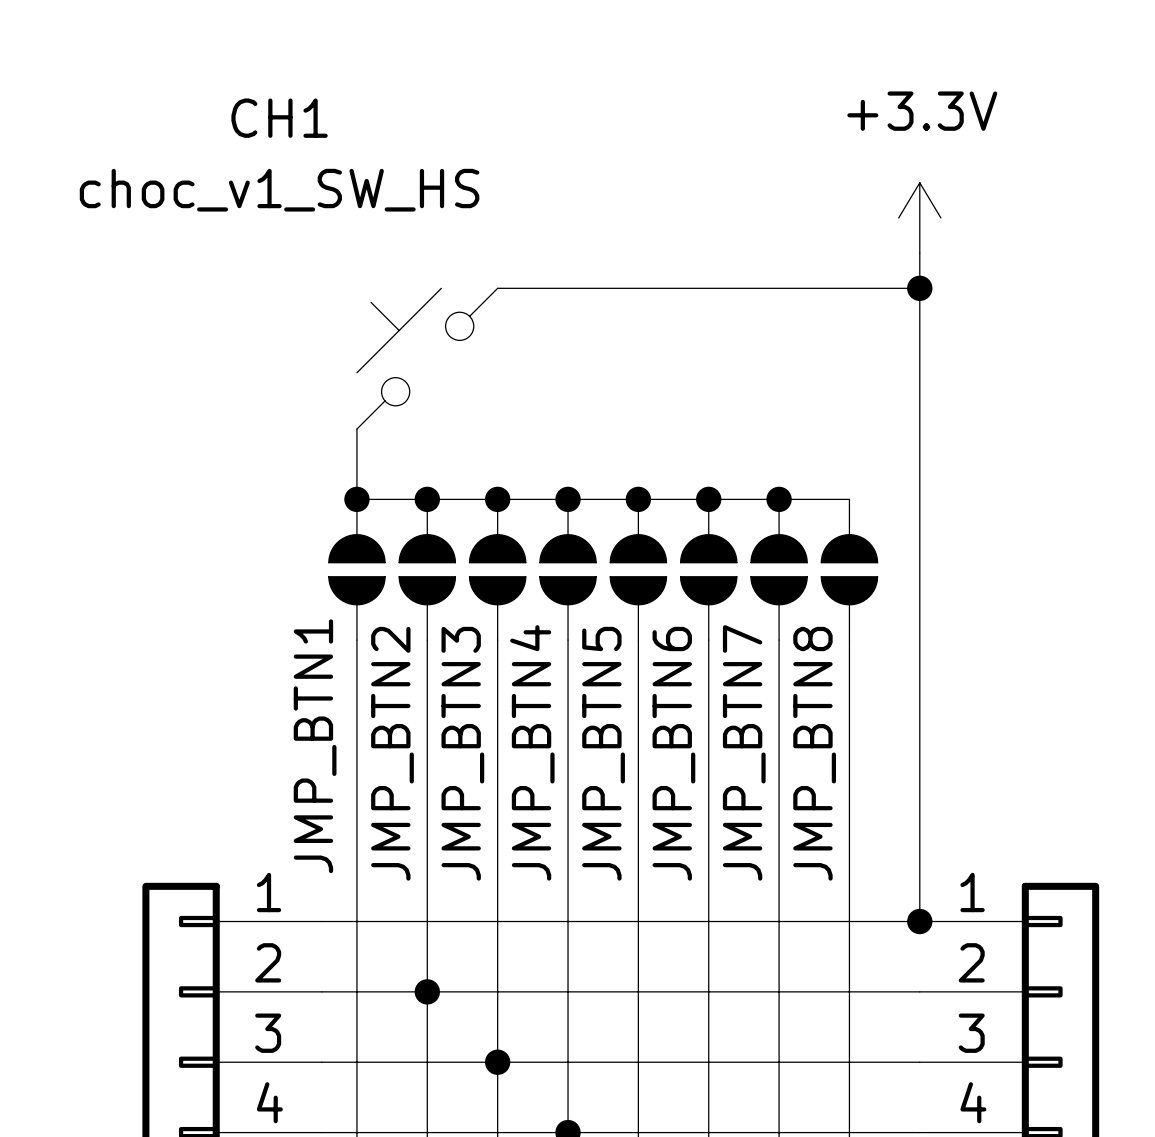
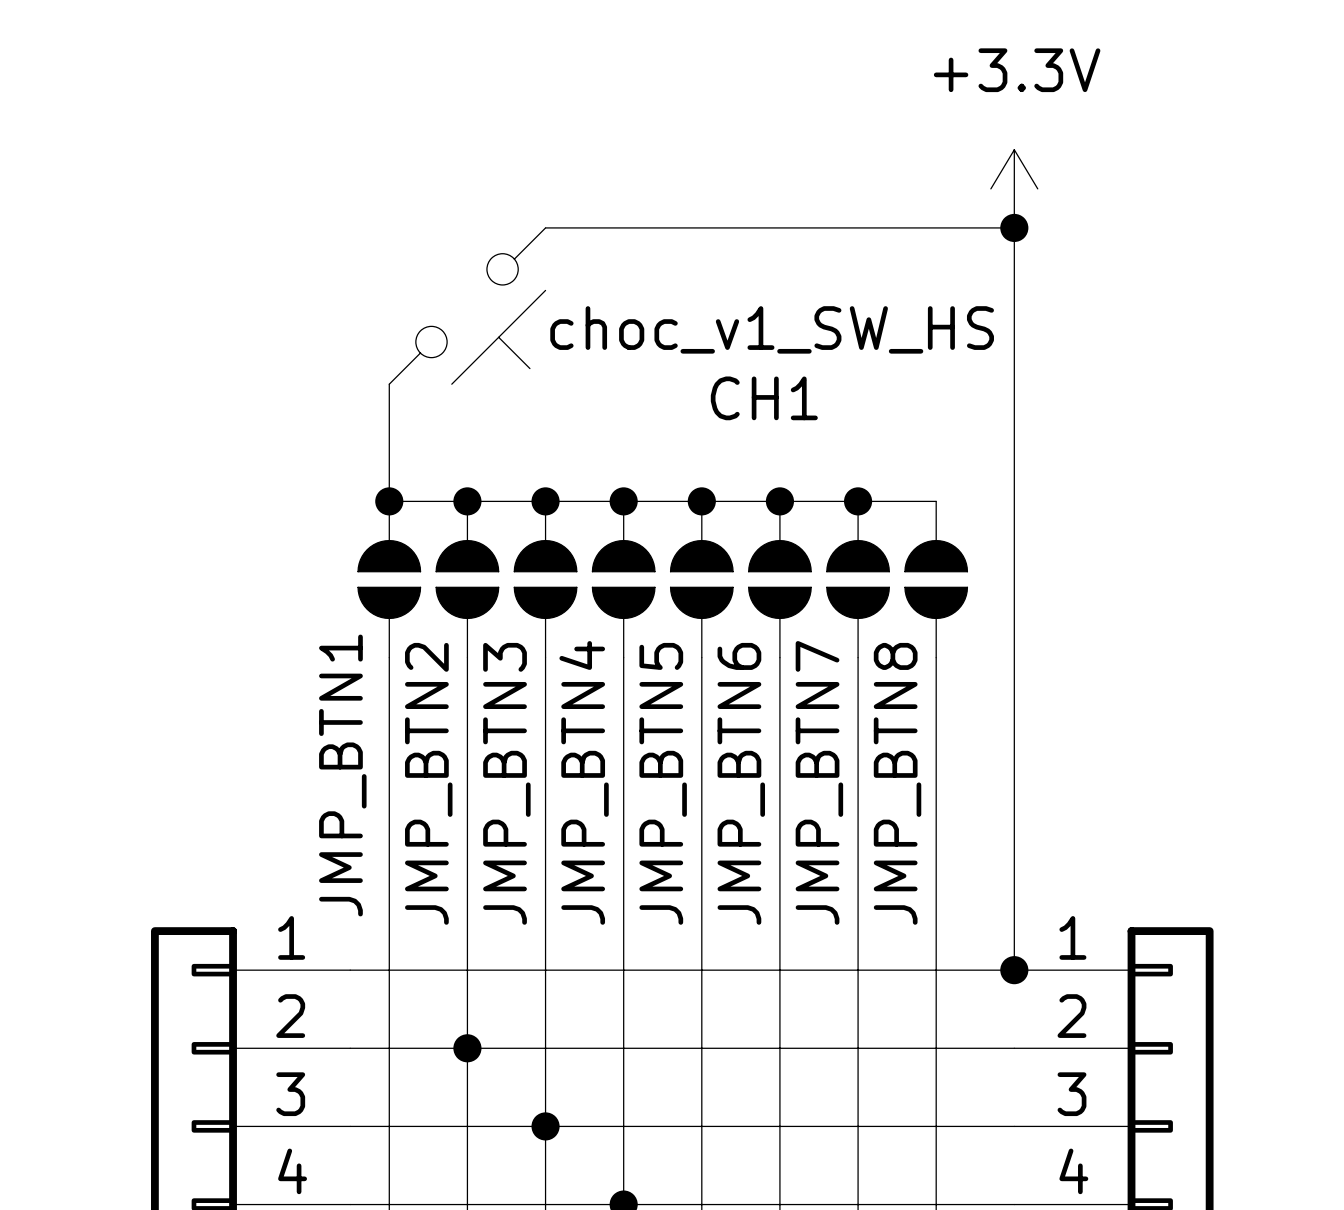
CH1 name position: CH1 (279, 118) -> CH1 (764, 398)
CH1 value position: choc_v1_SW_HS (279, 190) -> choc_v1_SW_HS (772, 329)
wire: (497, 288) (919, 288) -> (545, 227) (1014, 227)
junction position: (919, 288) -> (1014, 227)
CH1 rotation: 0° (427, 358) -> 180° (467, 306)
wire: none -> (389, 384) (389, 423)

